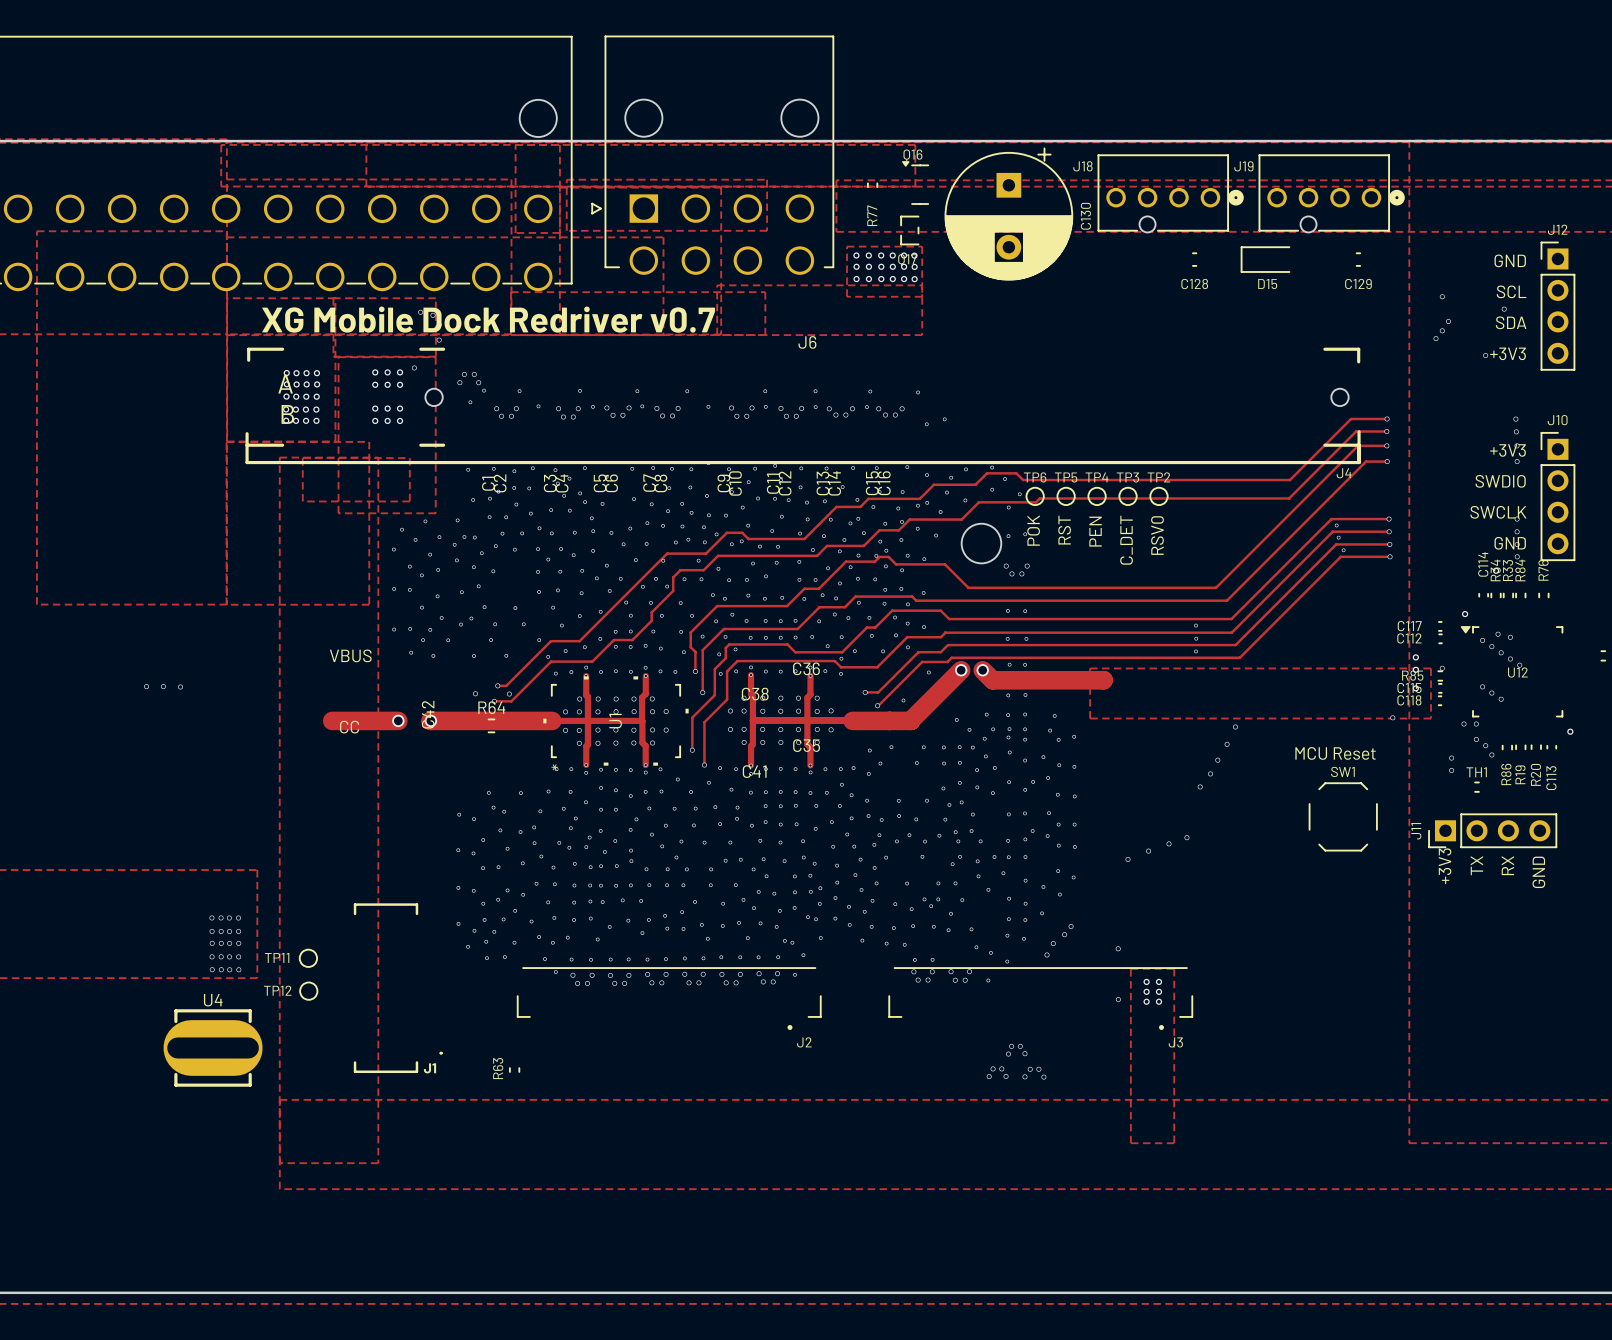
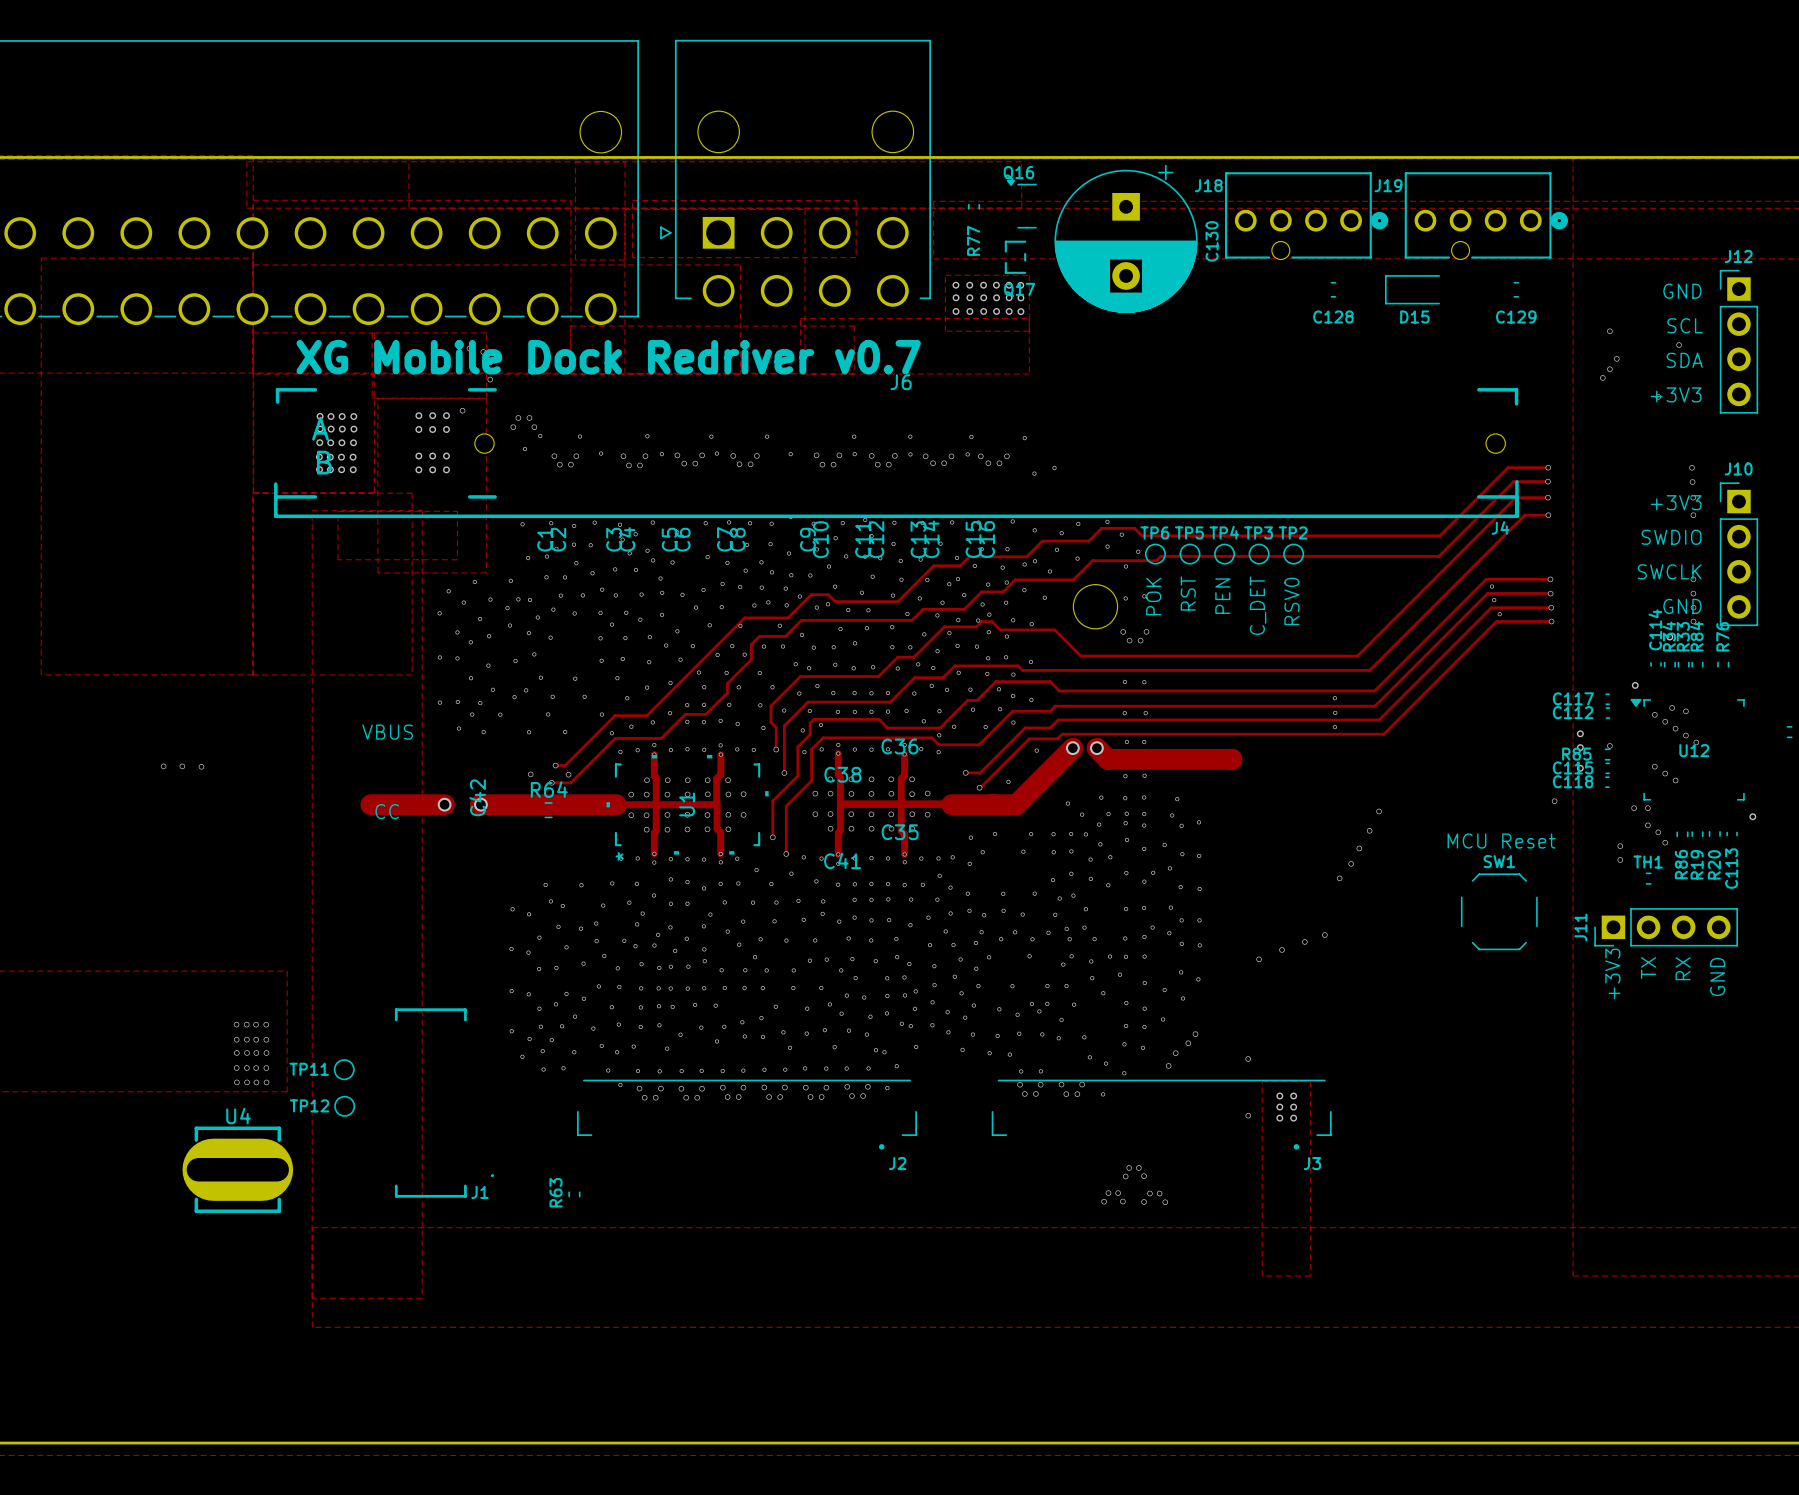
zone outline: (1090, 668) (1090, 718) (1430, 718) (1430, 668) (1090, 668) -> none

